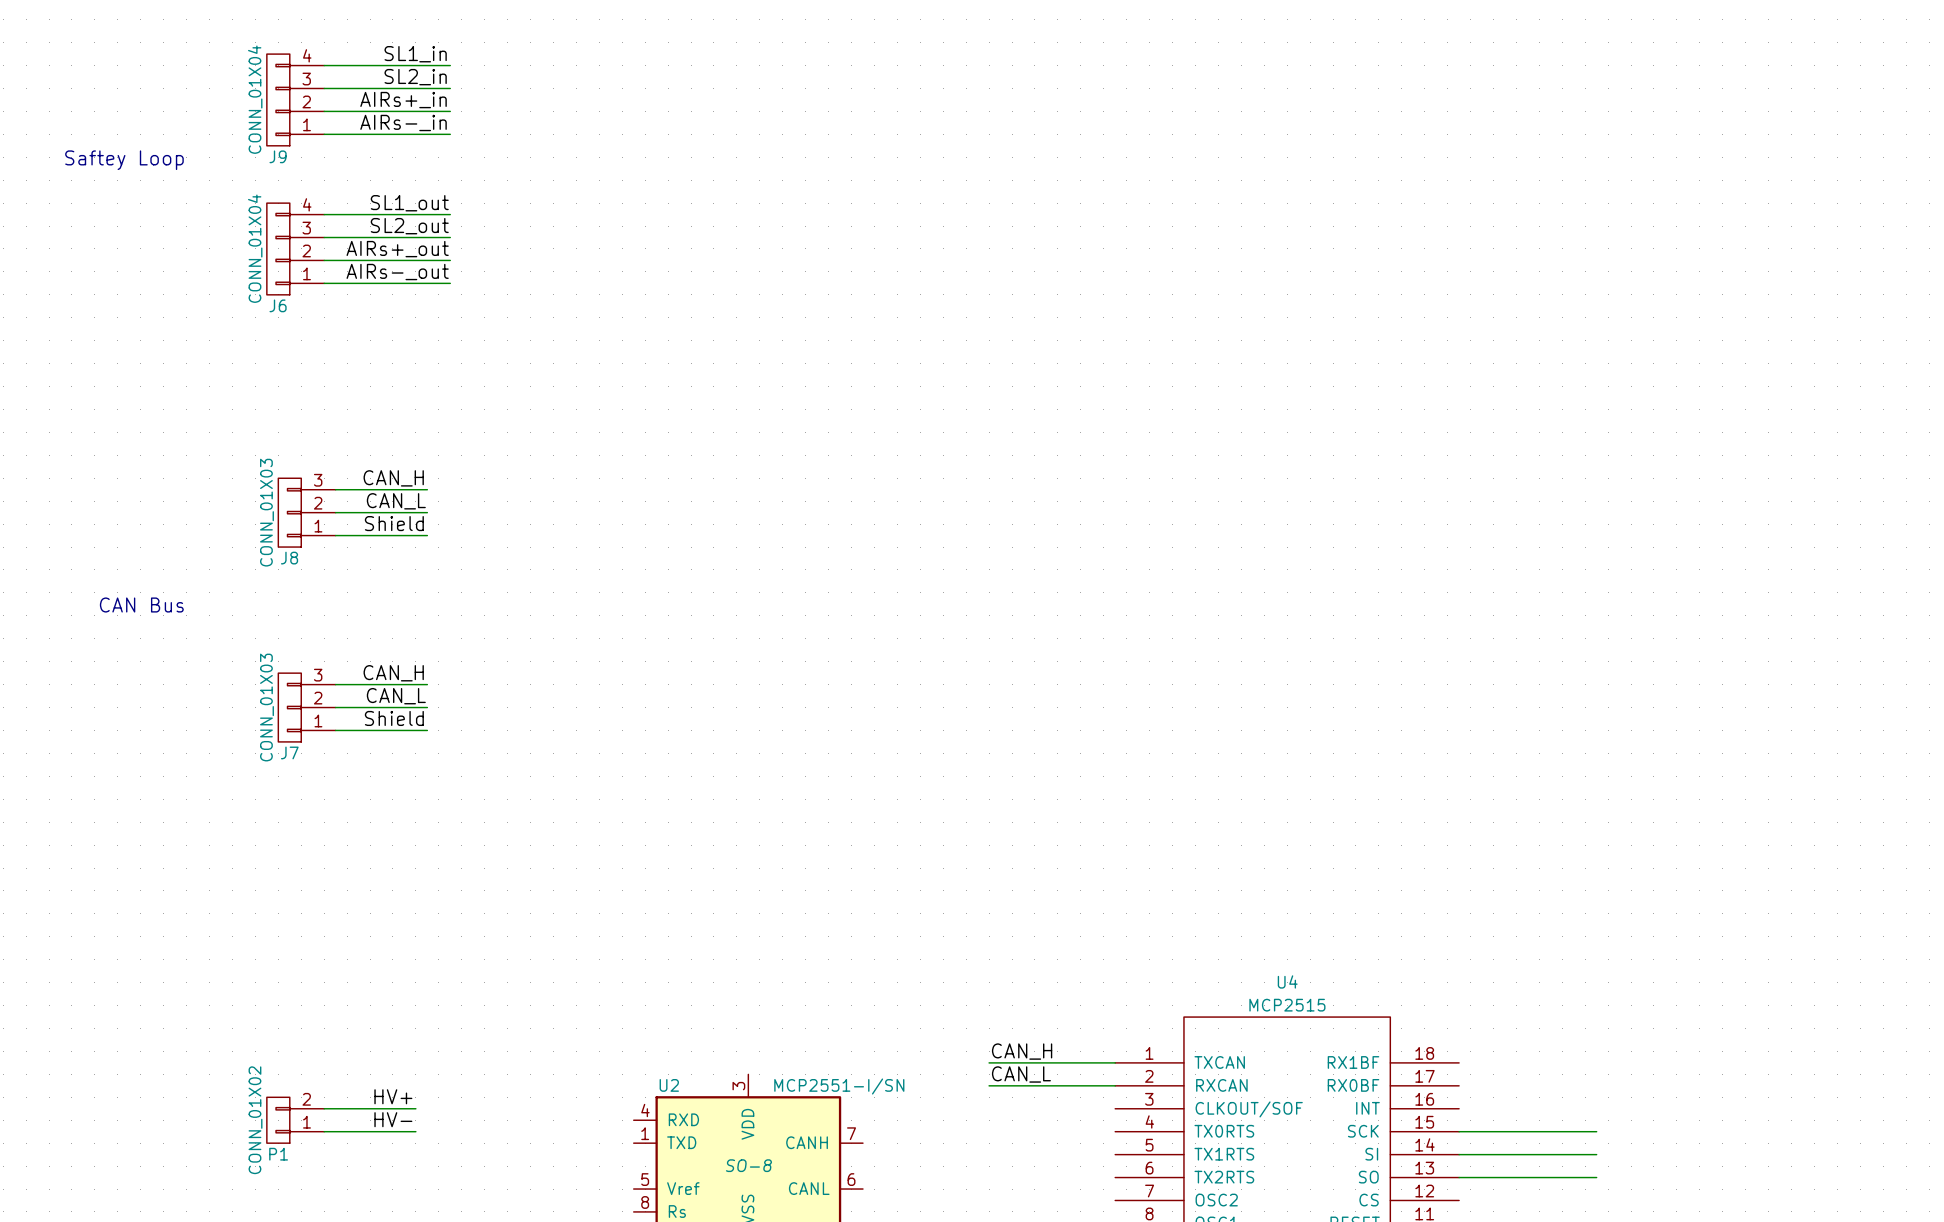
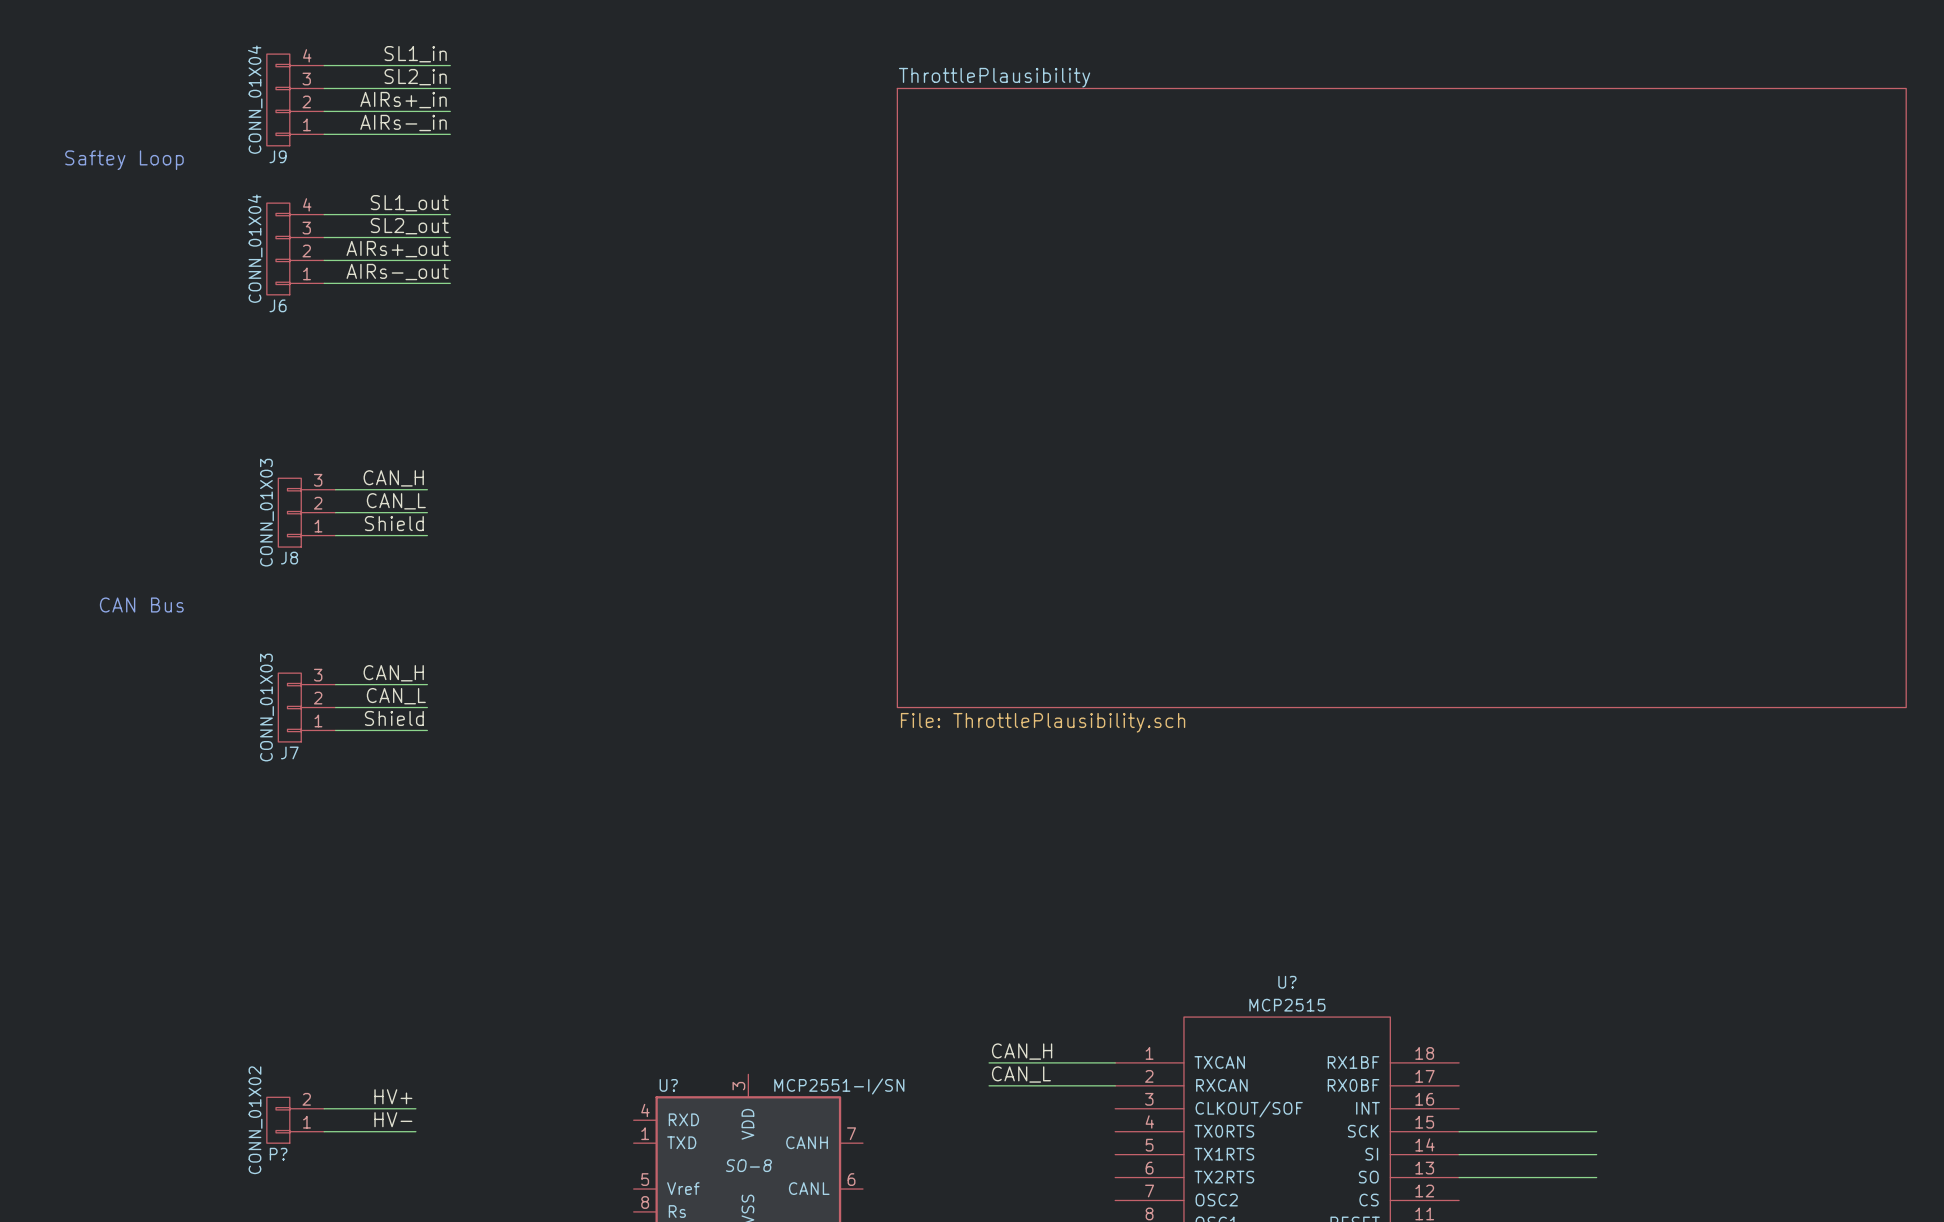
sheet ThrottlePlausibility: none -> File: ThrottlePlausibility.sch (1401, 398)
U4 name: U4 (1287, 981) -> U? (1287, 982)
U2 name: U2 (669, 1085) -> U? (668, 1085)
P1 name: P1 (278, 1154) -> P? (278, 1154)

